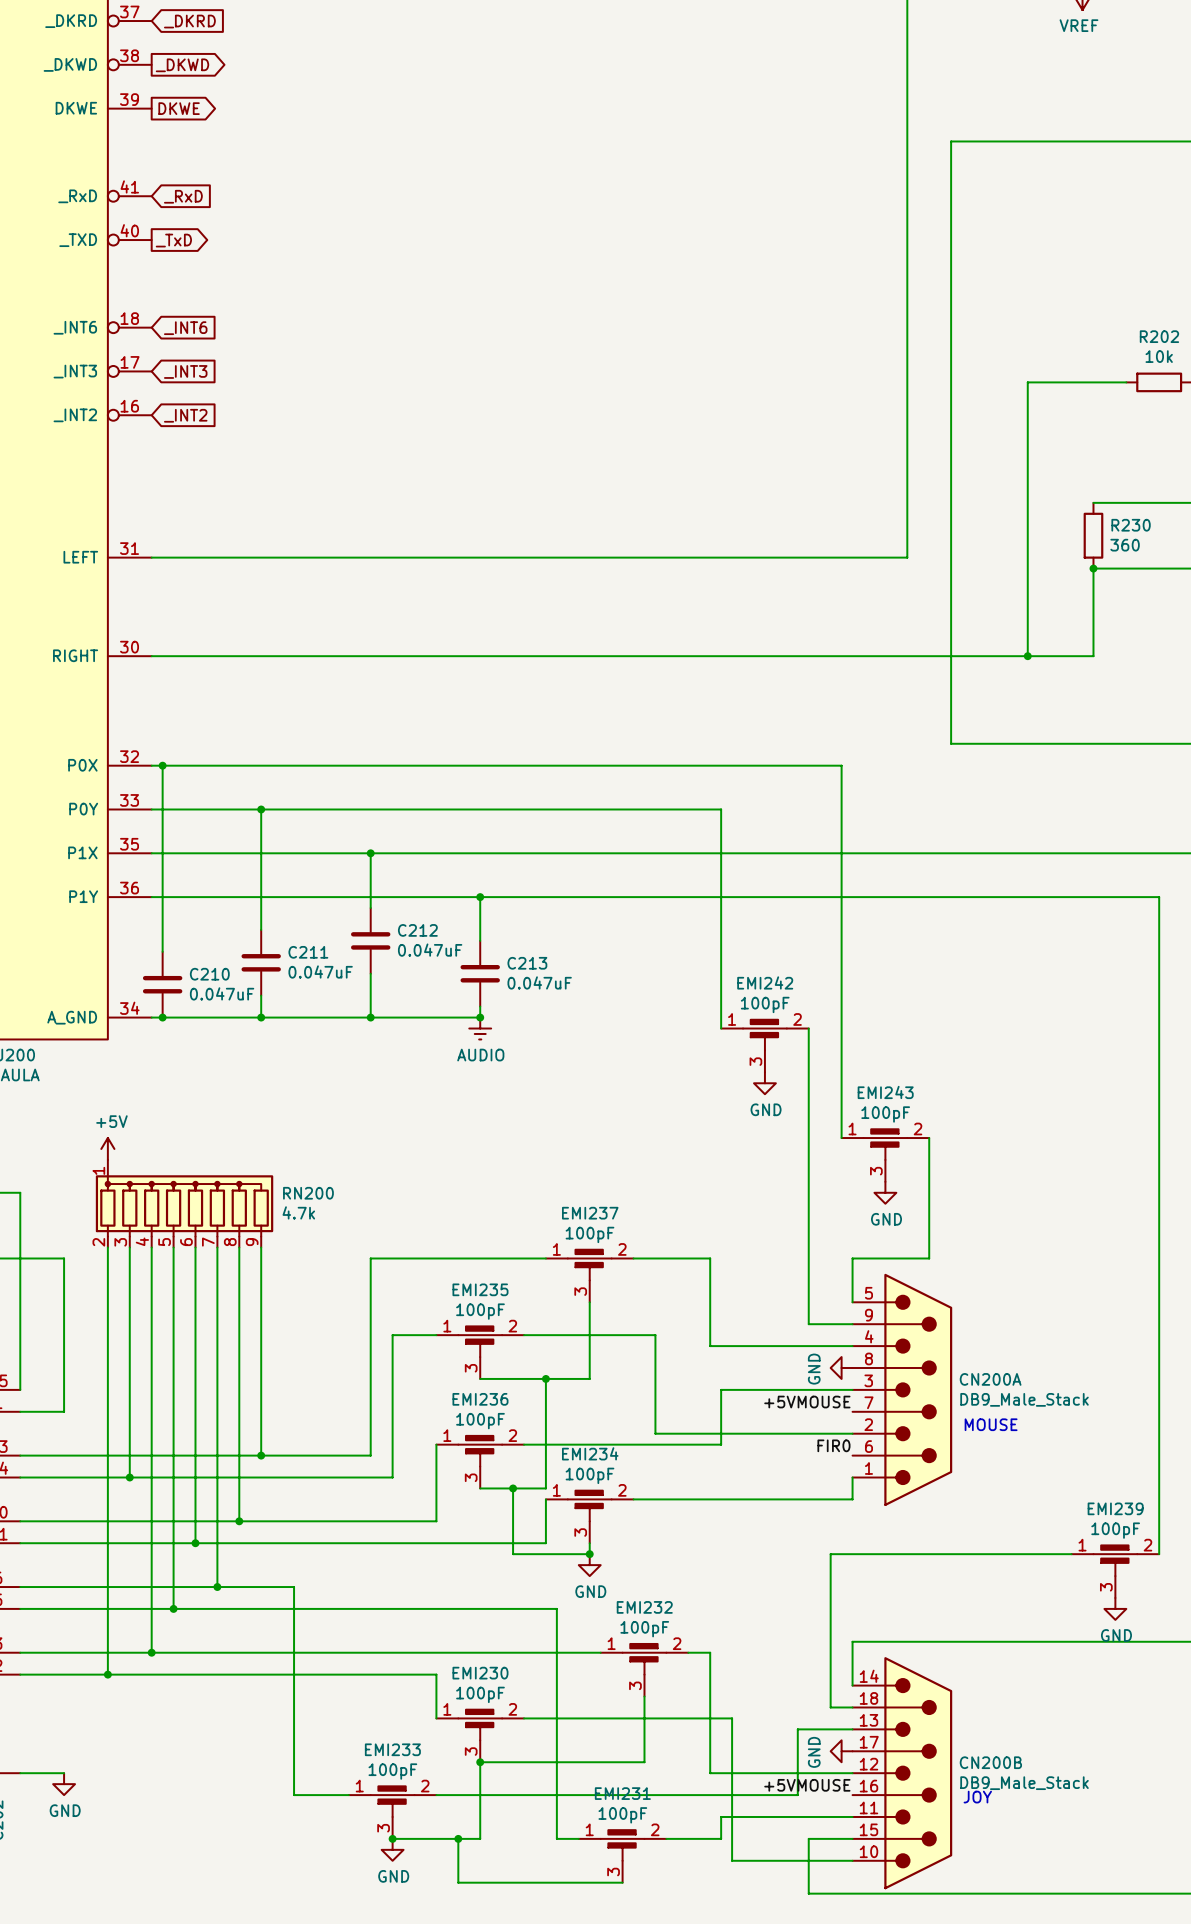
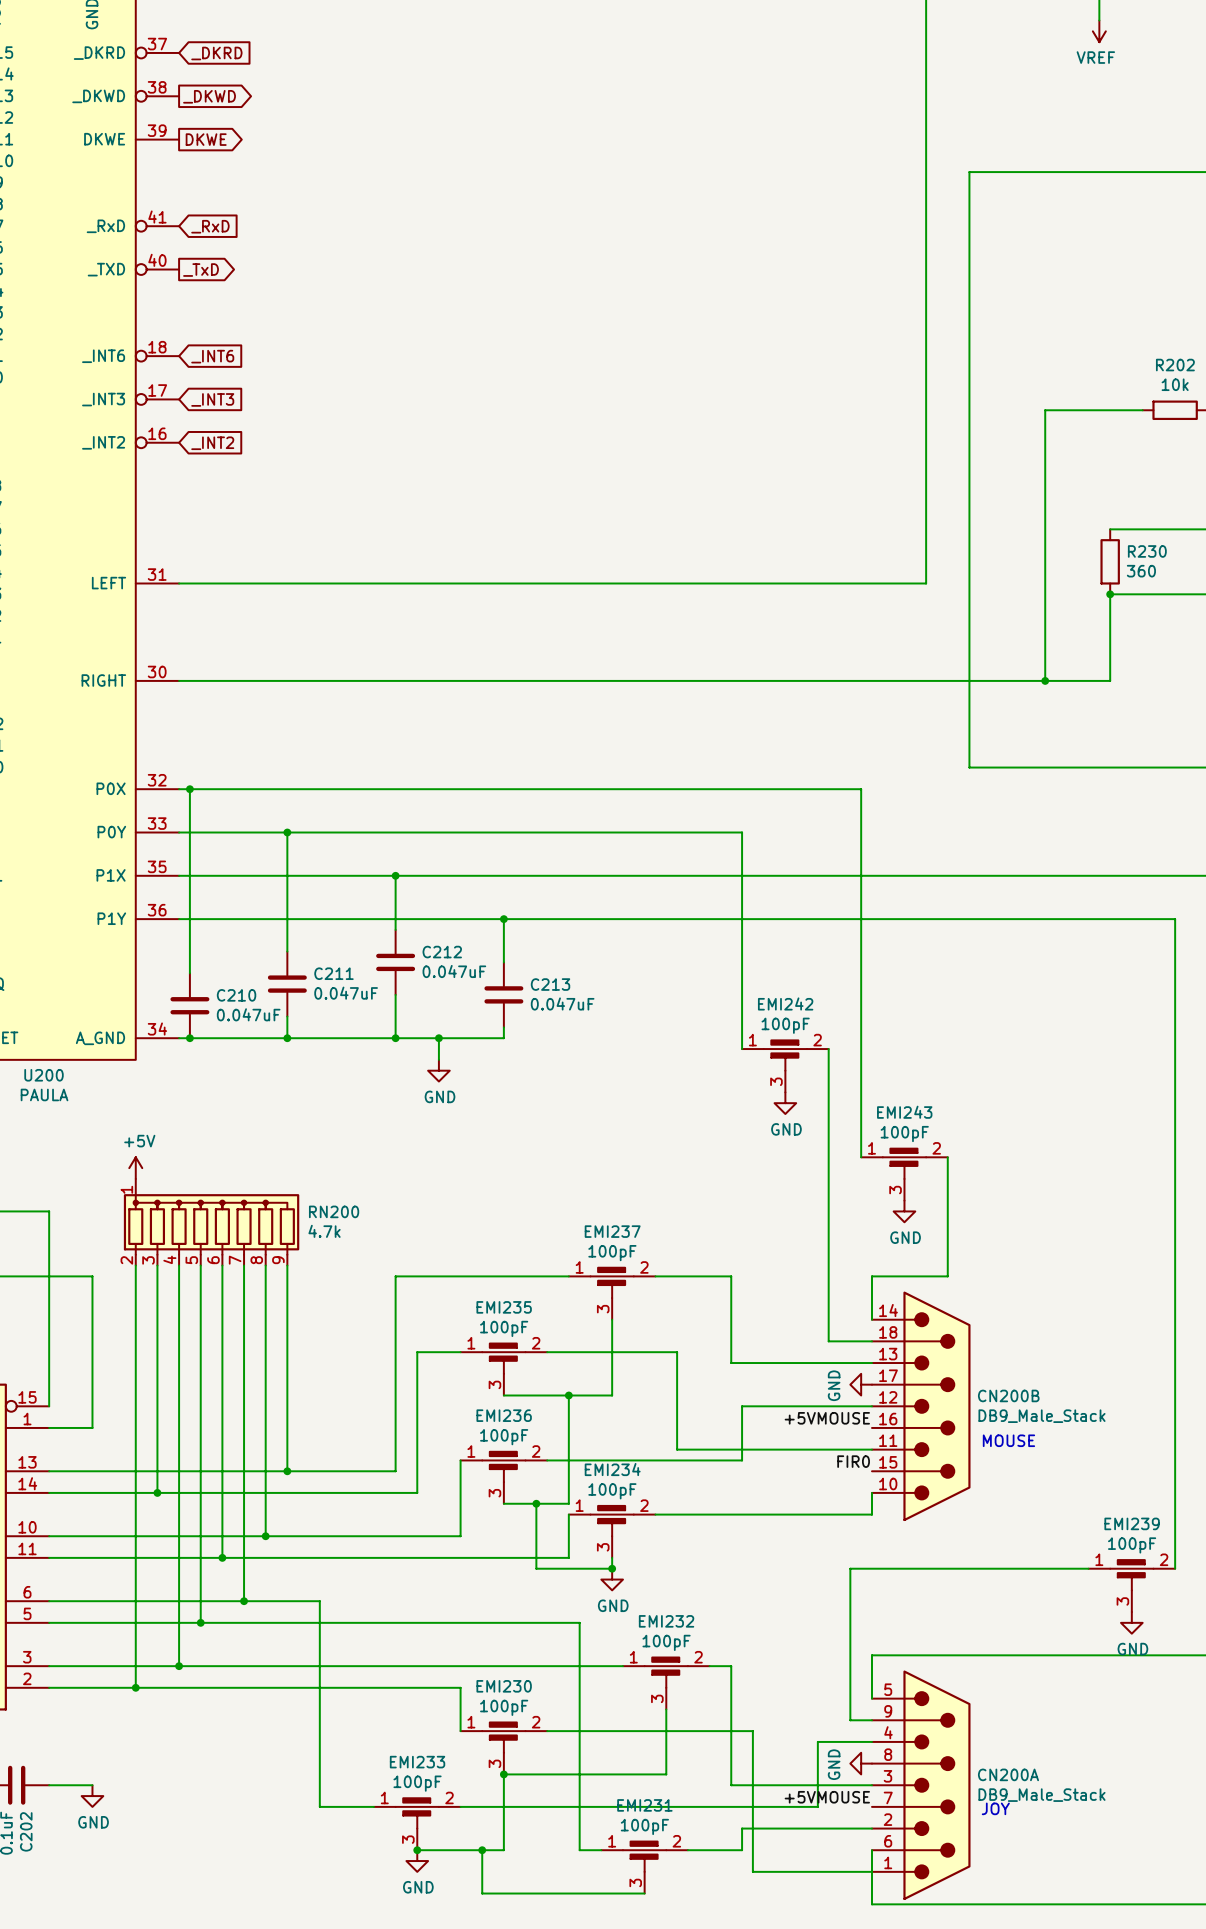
wire: none -> (438, 1038) (438, 1059)
junction: none -> (438, 1038)
junction: (480, 1017) -> none
power symbol: AUDIO (480, 1028) -> none
power symbol: none -> GND (438, 1070)
CN200A position: (902, 1389) -> (921, 1785)
CN200B position: (902, 1773) -> (921, 1406)
wire: (852, 1838) (808, 1838) (808, 1893) (852, 1893) -> (871, 1850) (871, 1904)

